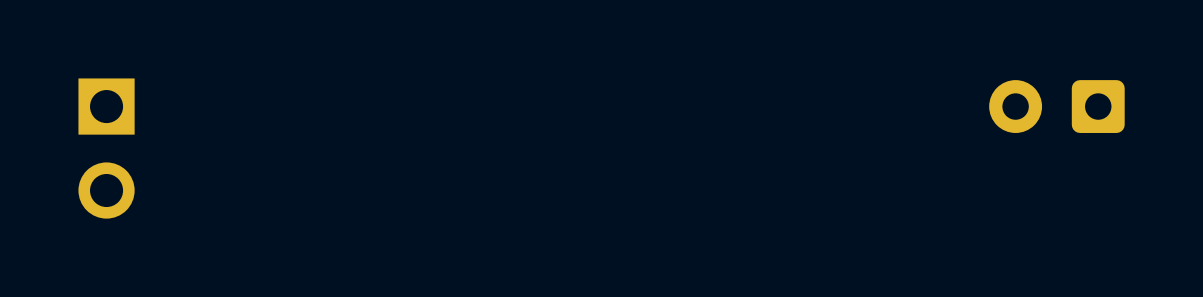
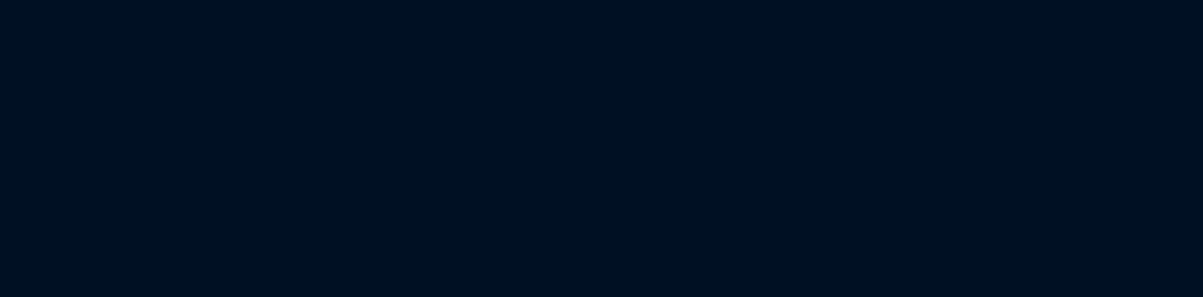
part: (1056, 106) -> none
part: (106, 148) -> none

